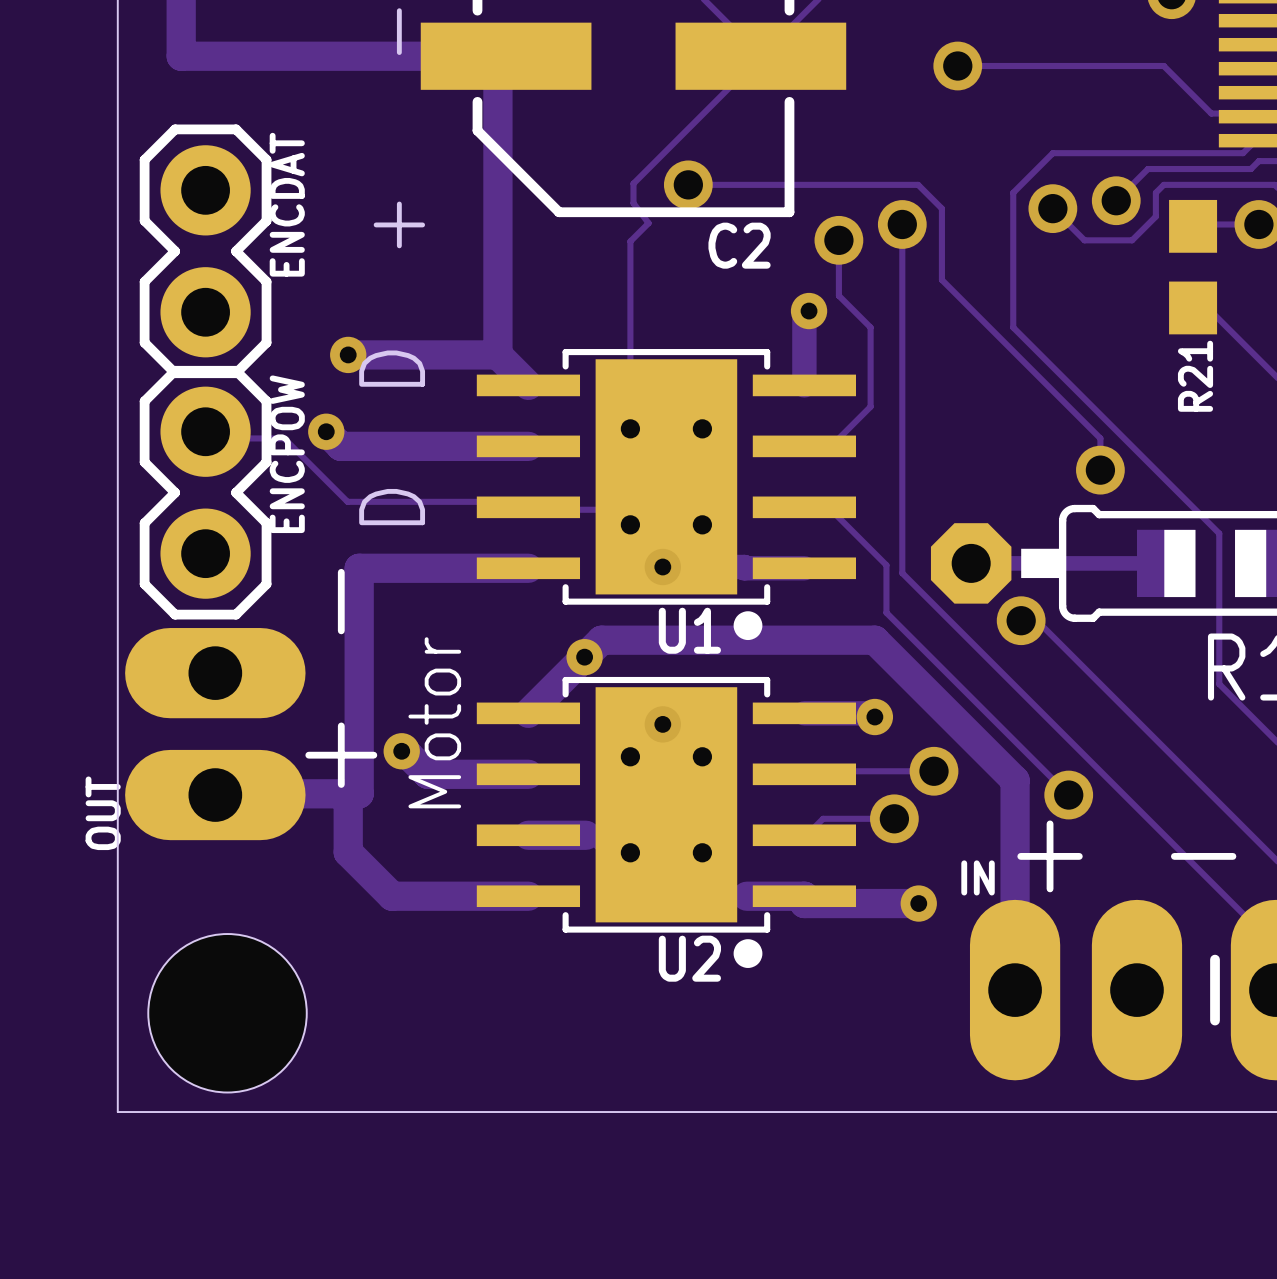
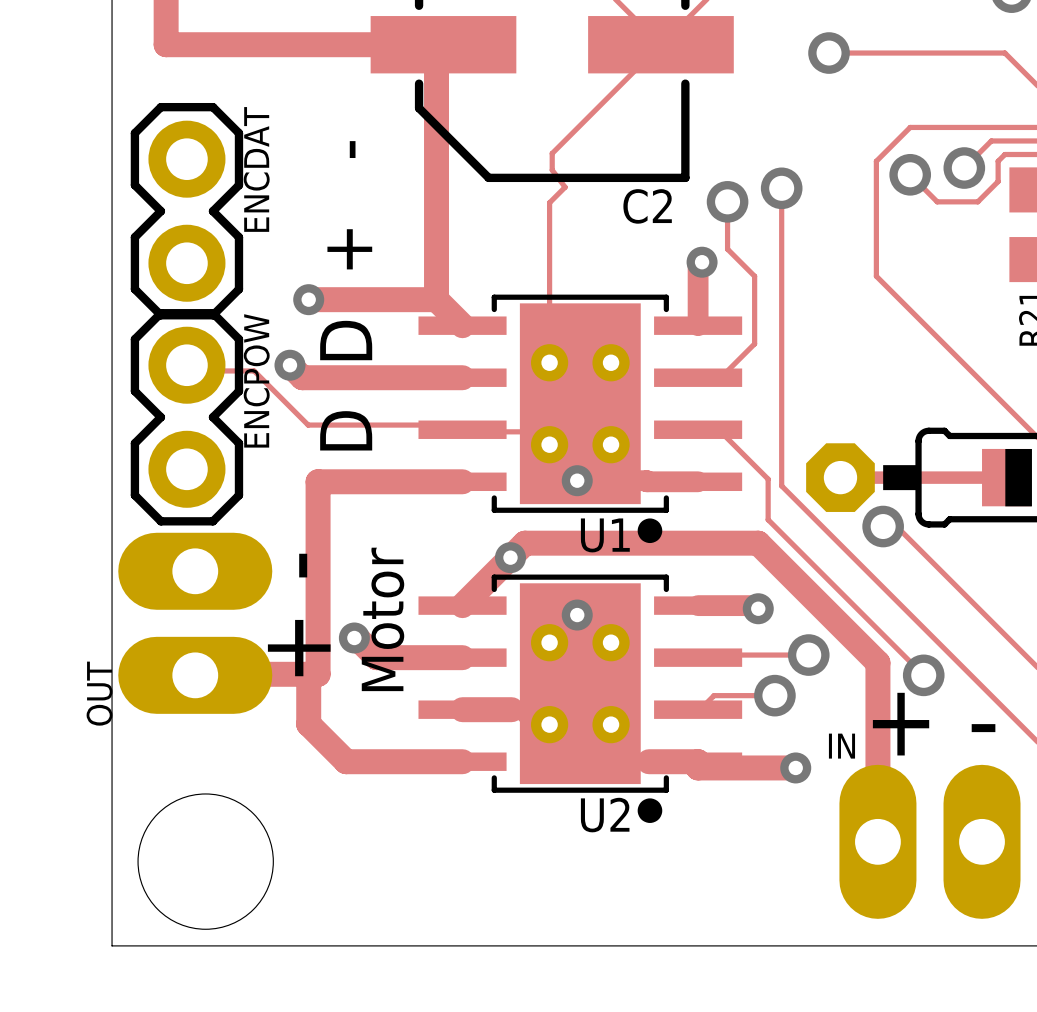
track: (688, 184) (918, 184) (941, 208) (941, 279) (1100, 438) (1100, 470) -> none
via: (688, 184) -> none
via: (1100, 470) -> none

